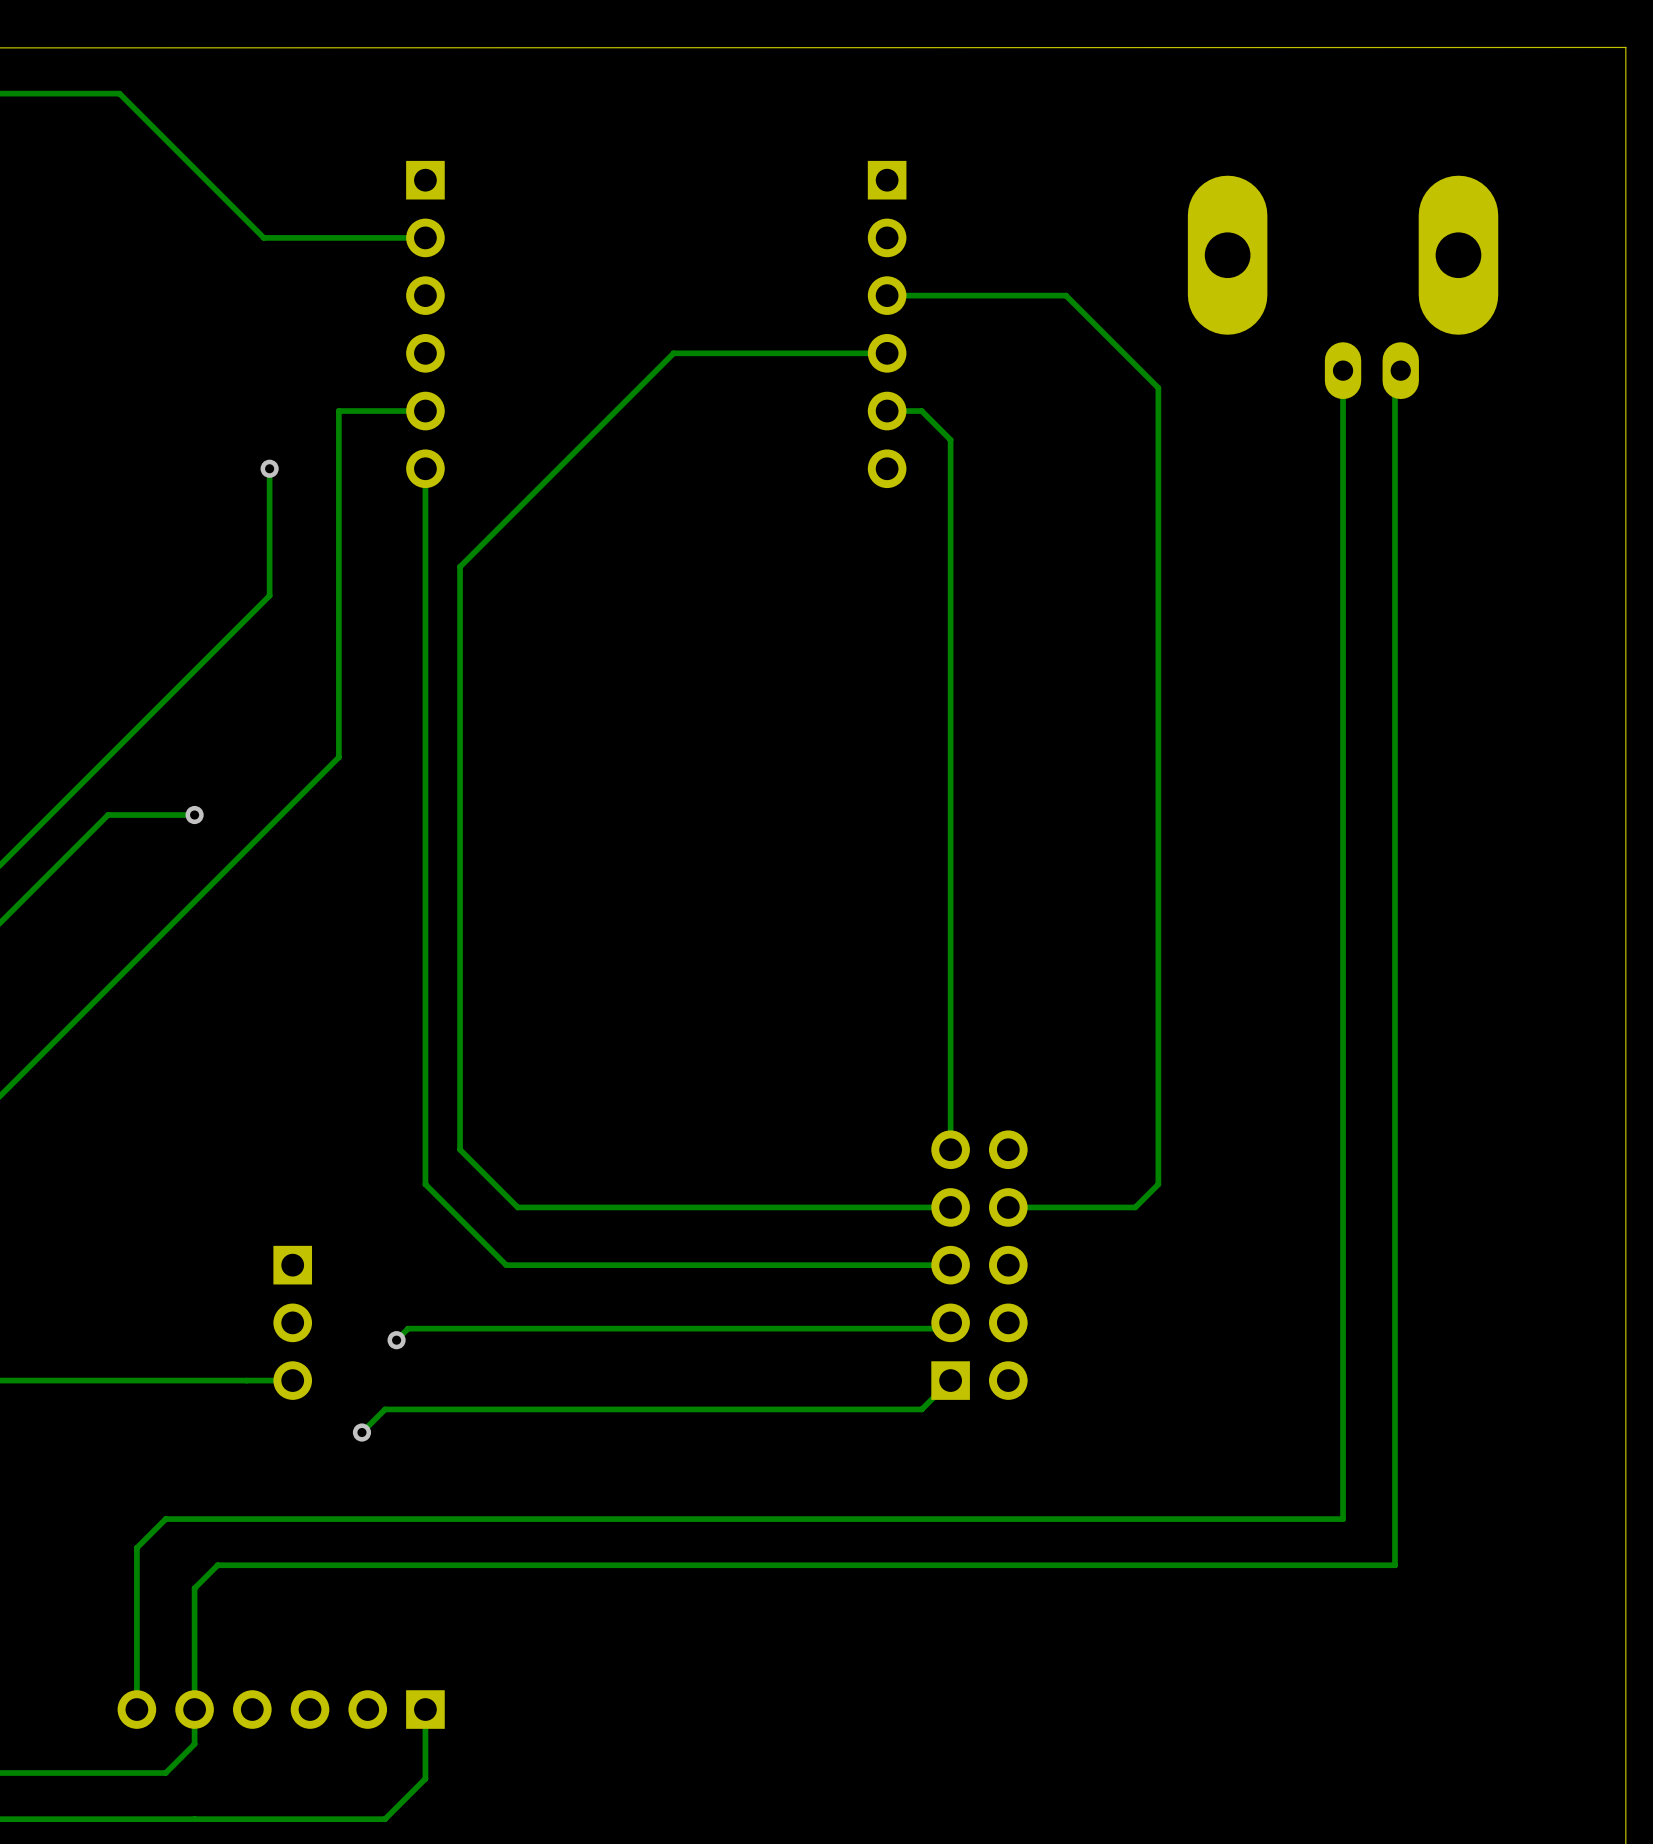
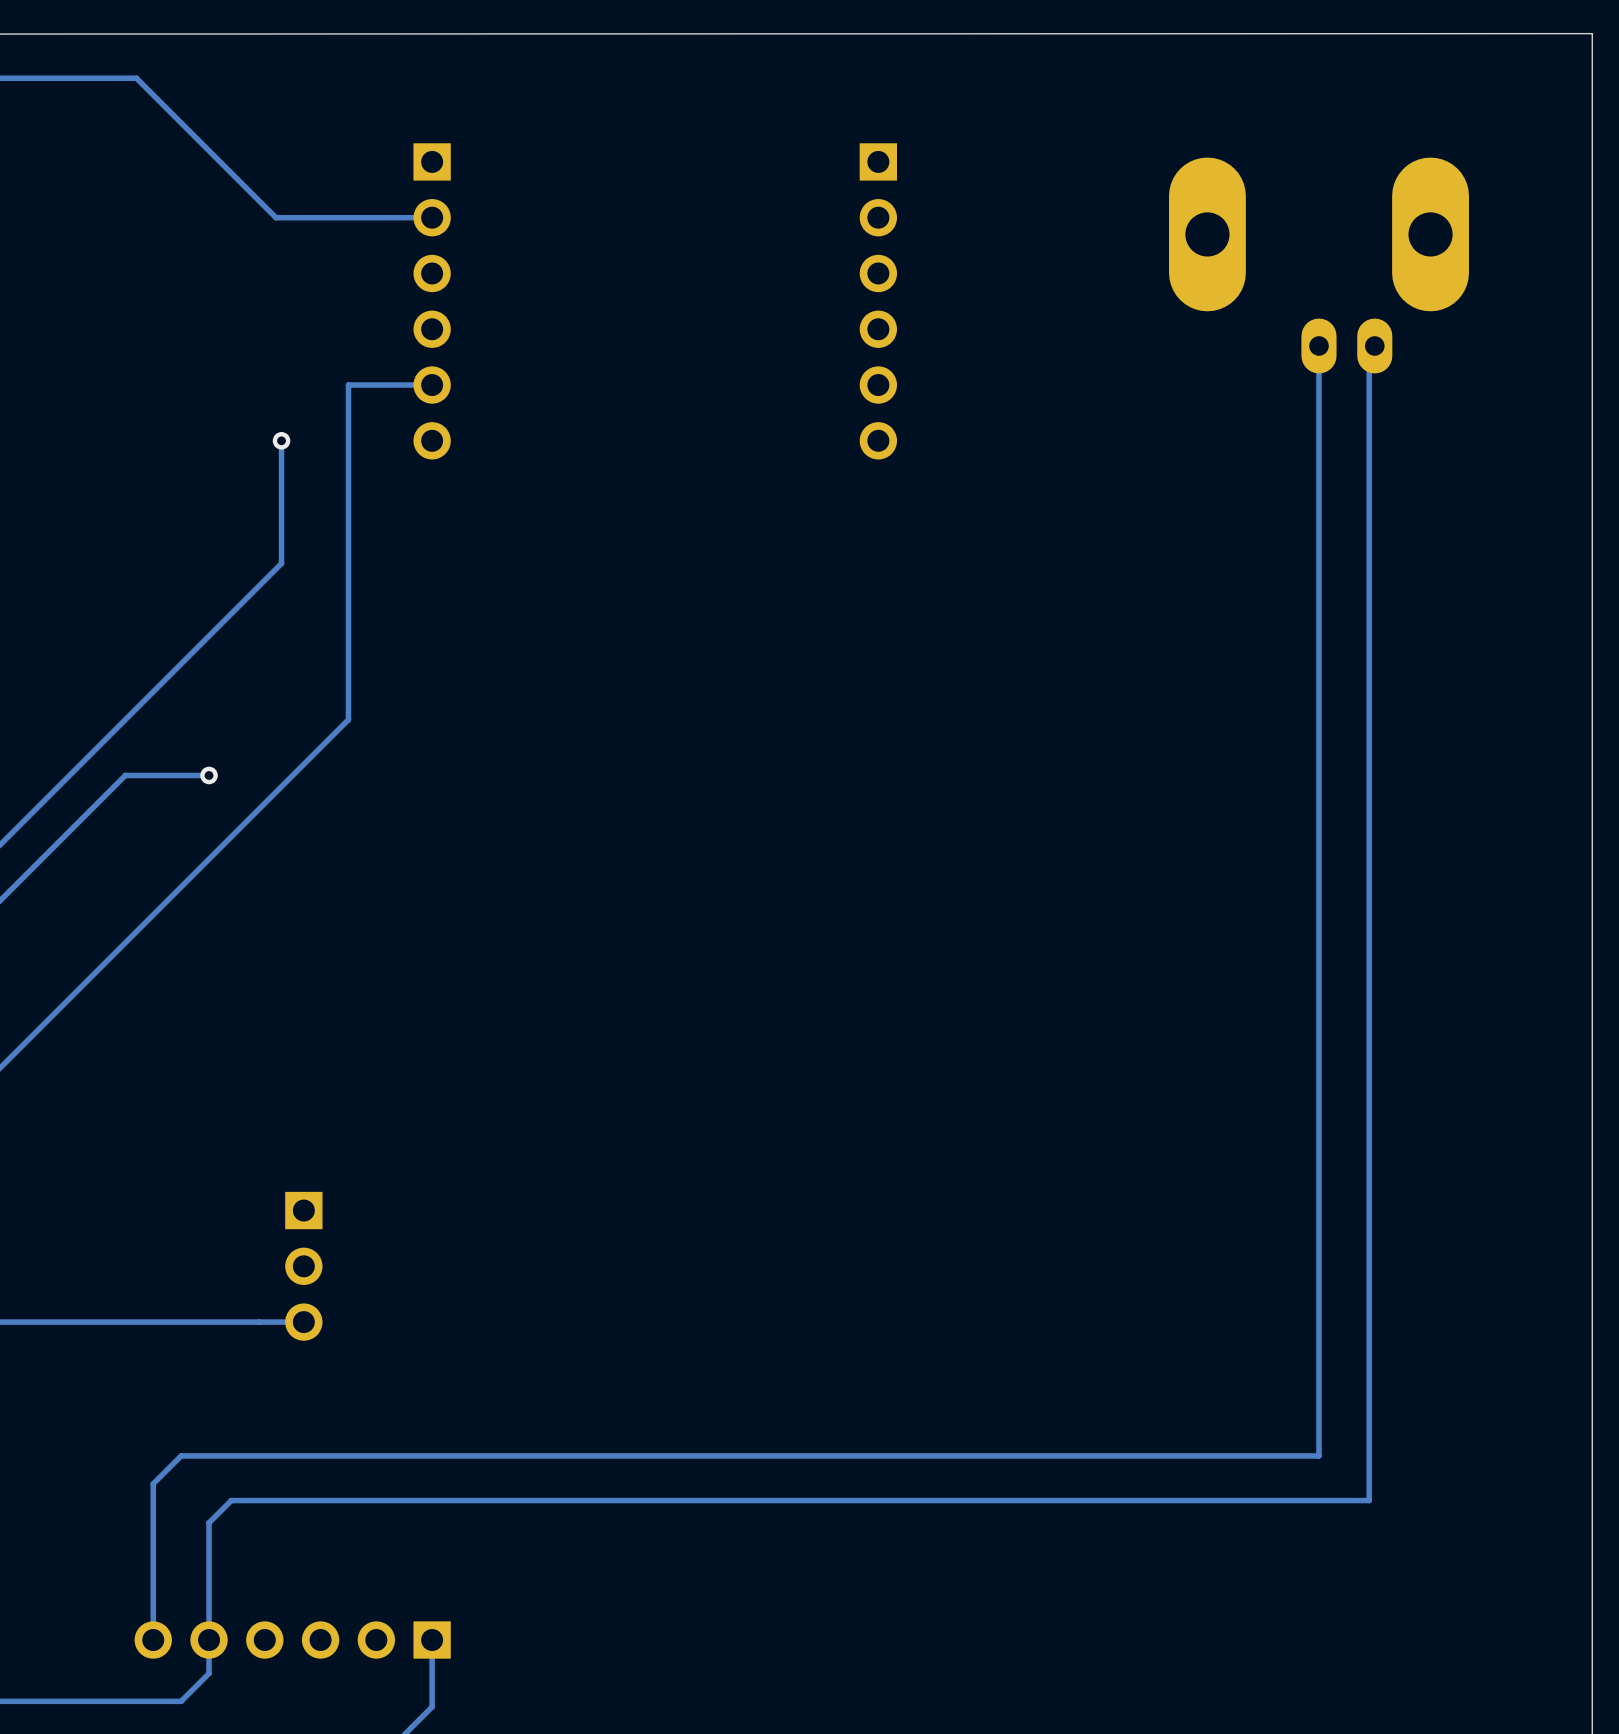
track: (887, 295) (1066, 295) (1158, 387) (1158, 1184) (1135, 1207) (1008, 1207) -> none
track: (887, 353) (673, 353) (460, 566) (460, 1149) (517, 1207) (950, 1207) -> none
track: (887, 411) (921, 411) (950, 439) (950, 1149) -> none
track: (425, 468) (425, 1184) (506, 1265) (950, 1265) -> none
part: (979, 1265) -> none
track: (950, 1322) (944, 1328) (408, 1328) (396, 1340) -> none
via: (396, 1340) -> none
track: (950, 1380) (921, 1409) (385, 1409) (361, 1432) -> none
via: (361, 1432) -> none

